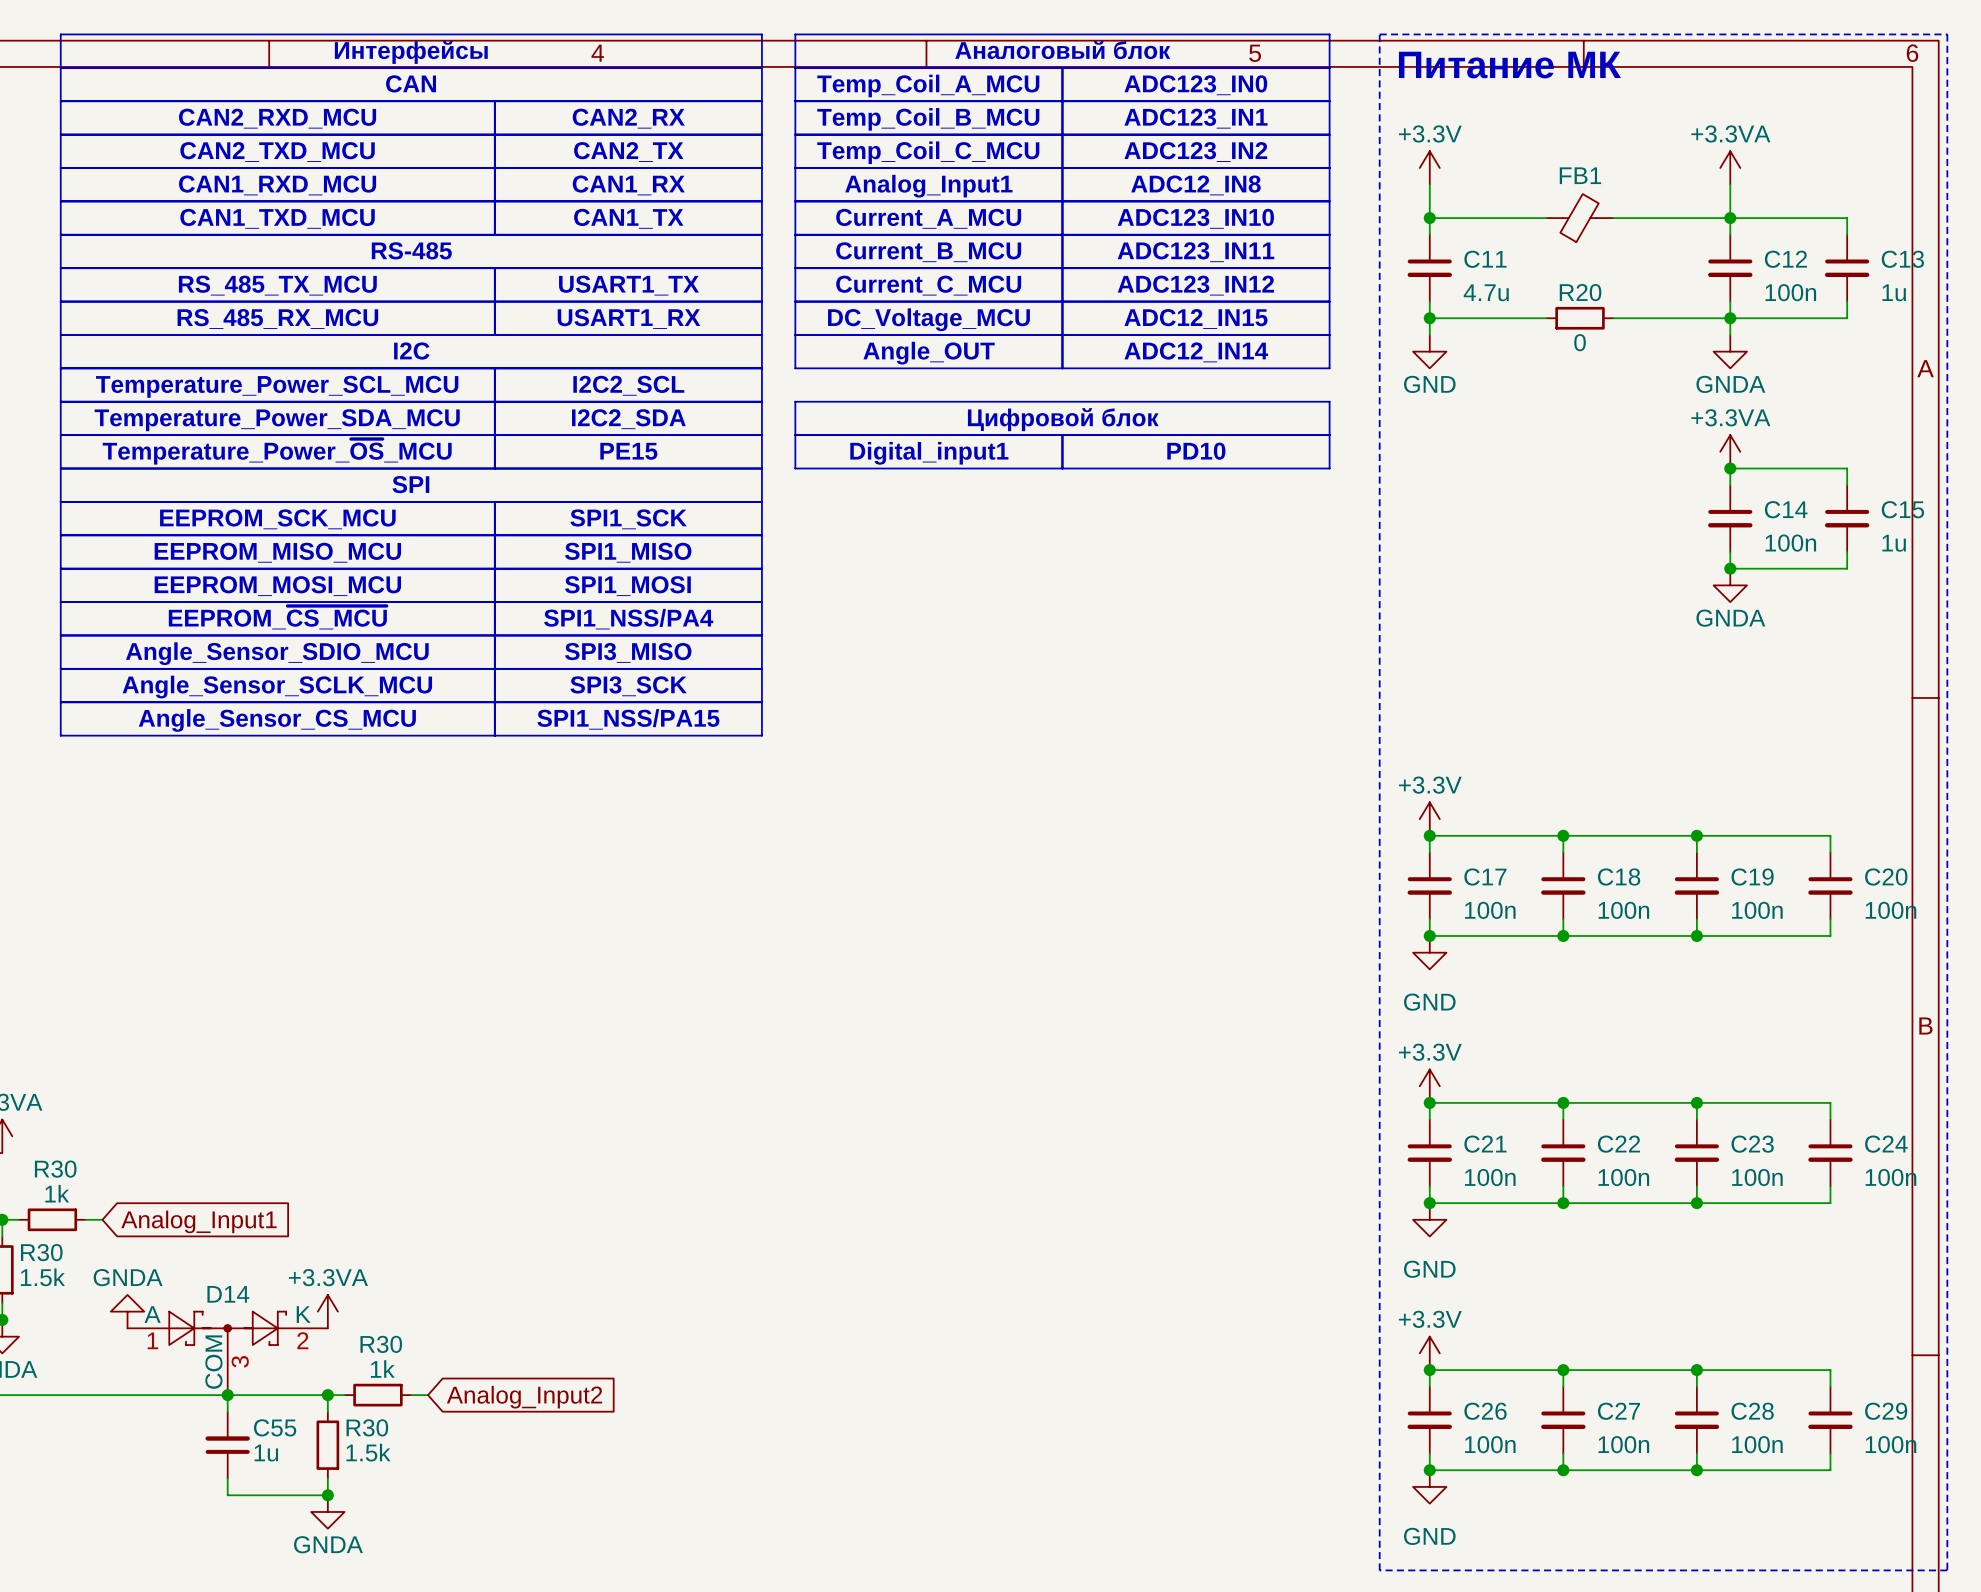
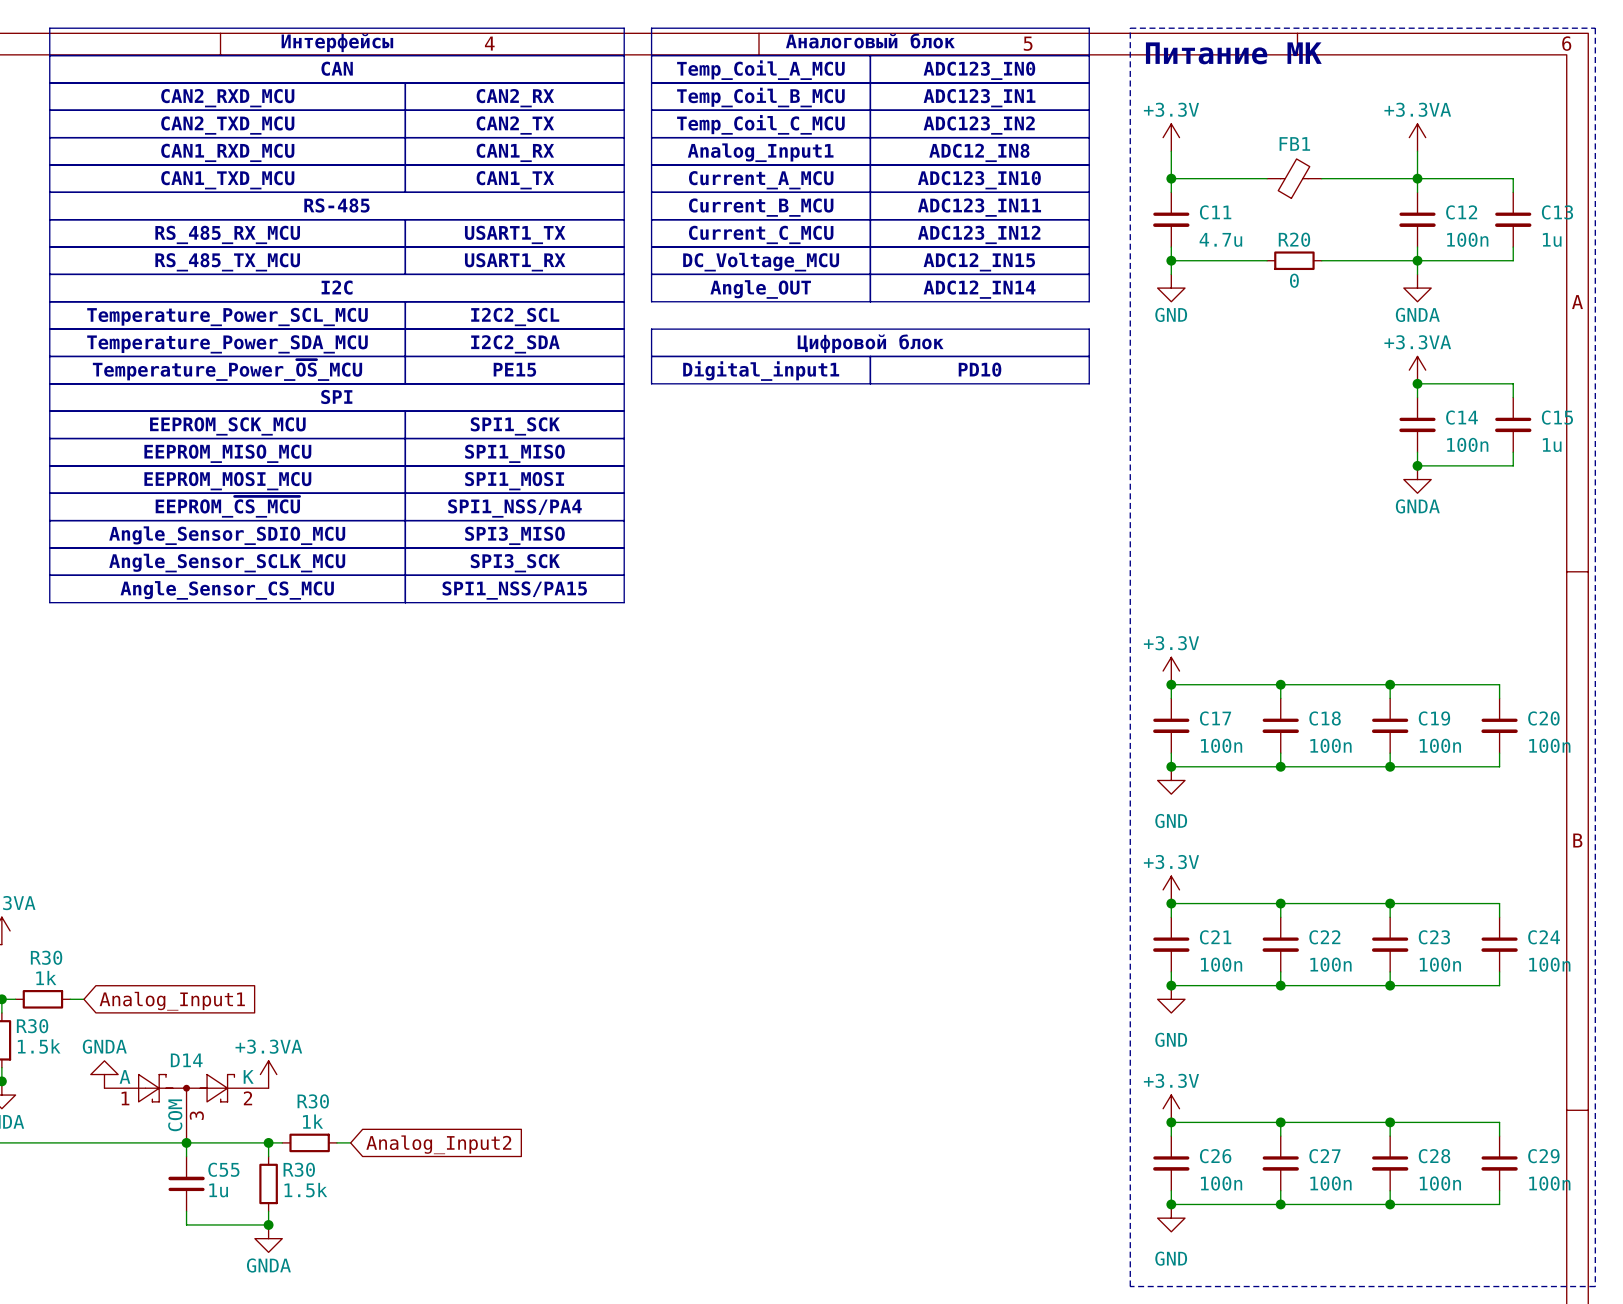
text: RS_485_TX_MCU (277, 285) -> RS_485_RX_MCU (227, 234)
text: RS_485_RX_MCU (277, 318) -> RS_485_TX_MCU (227, 262)

